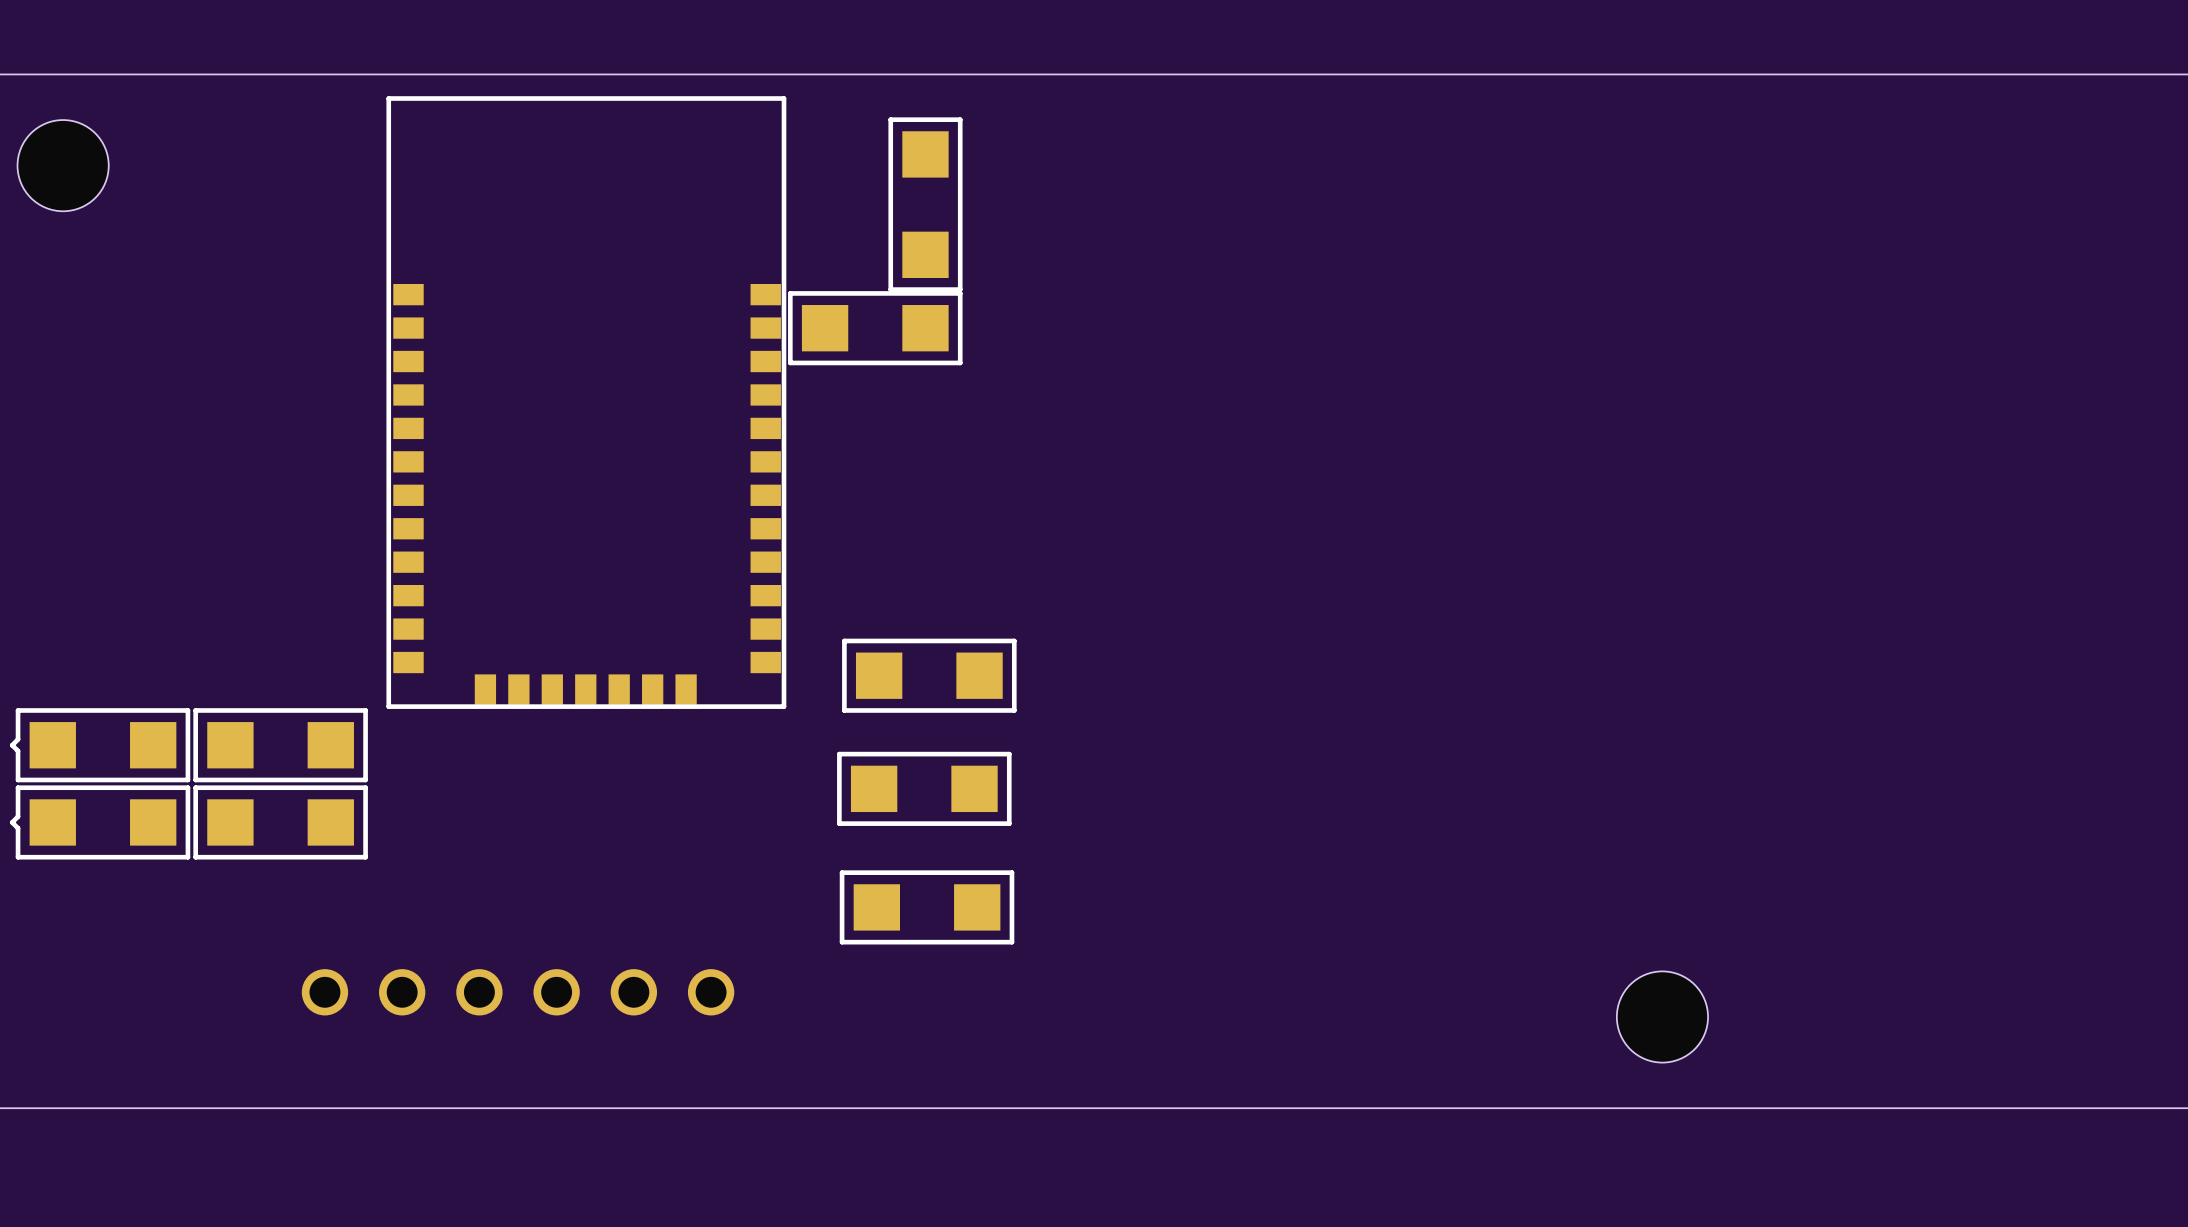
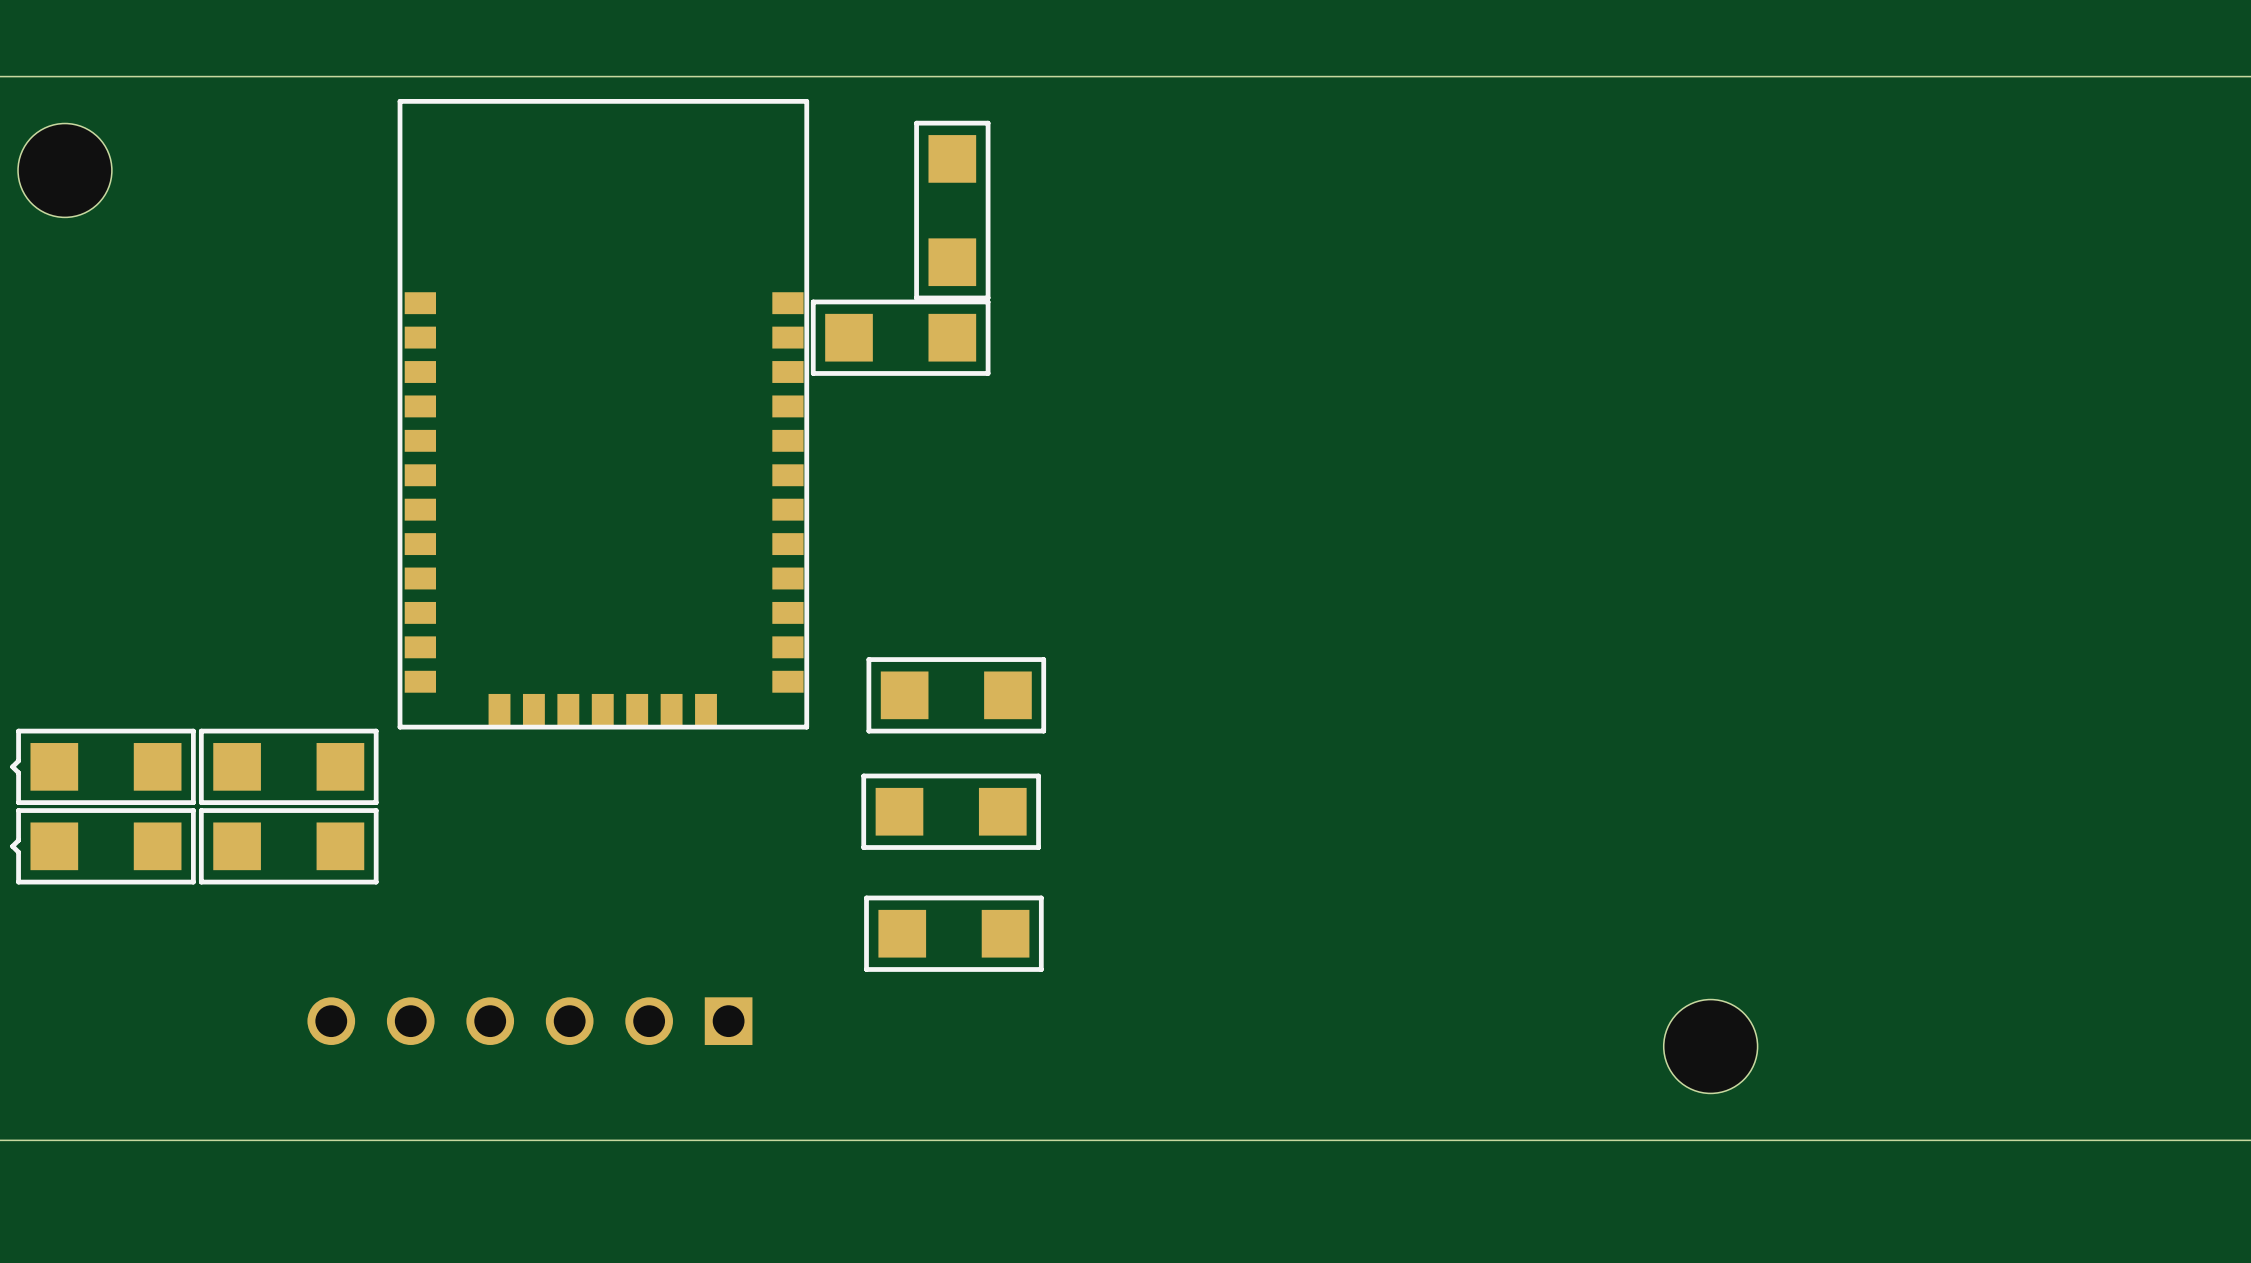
part footprint: [301, 969, 735, 1016] -> [307, 997, 753, 1045]

